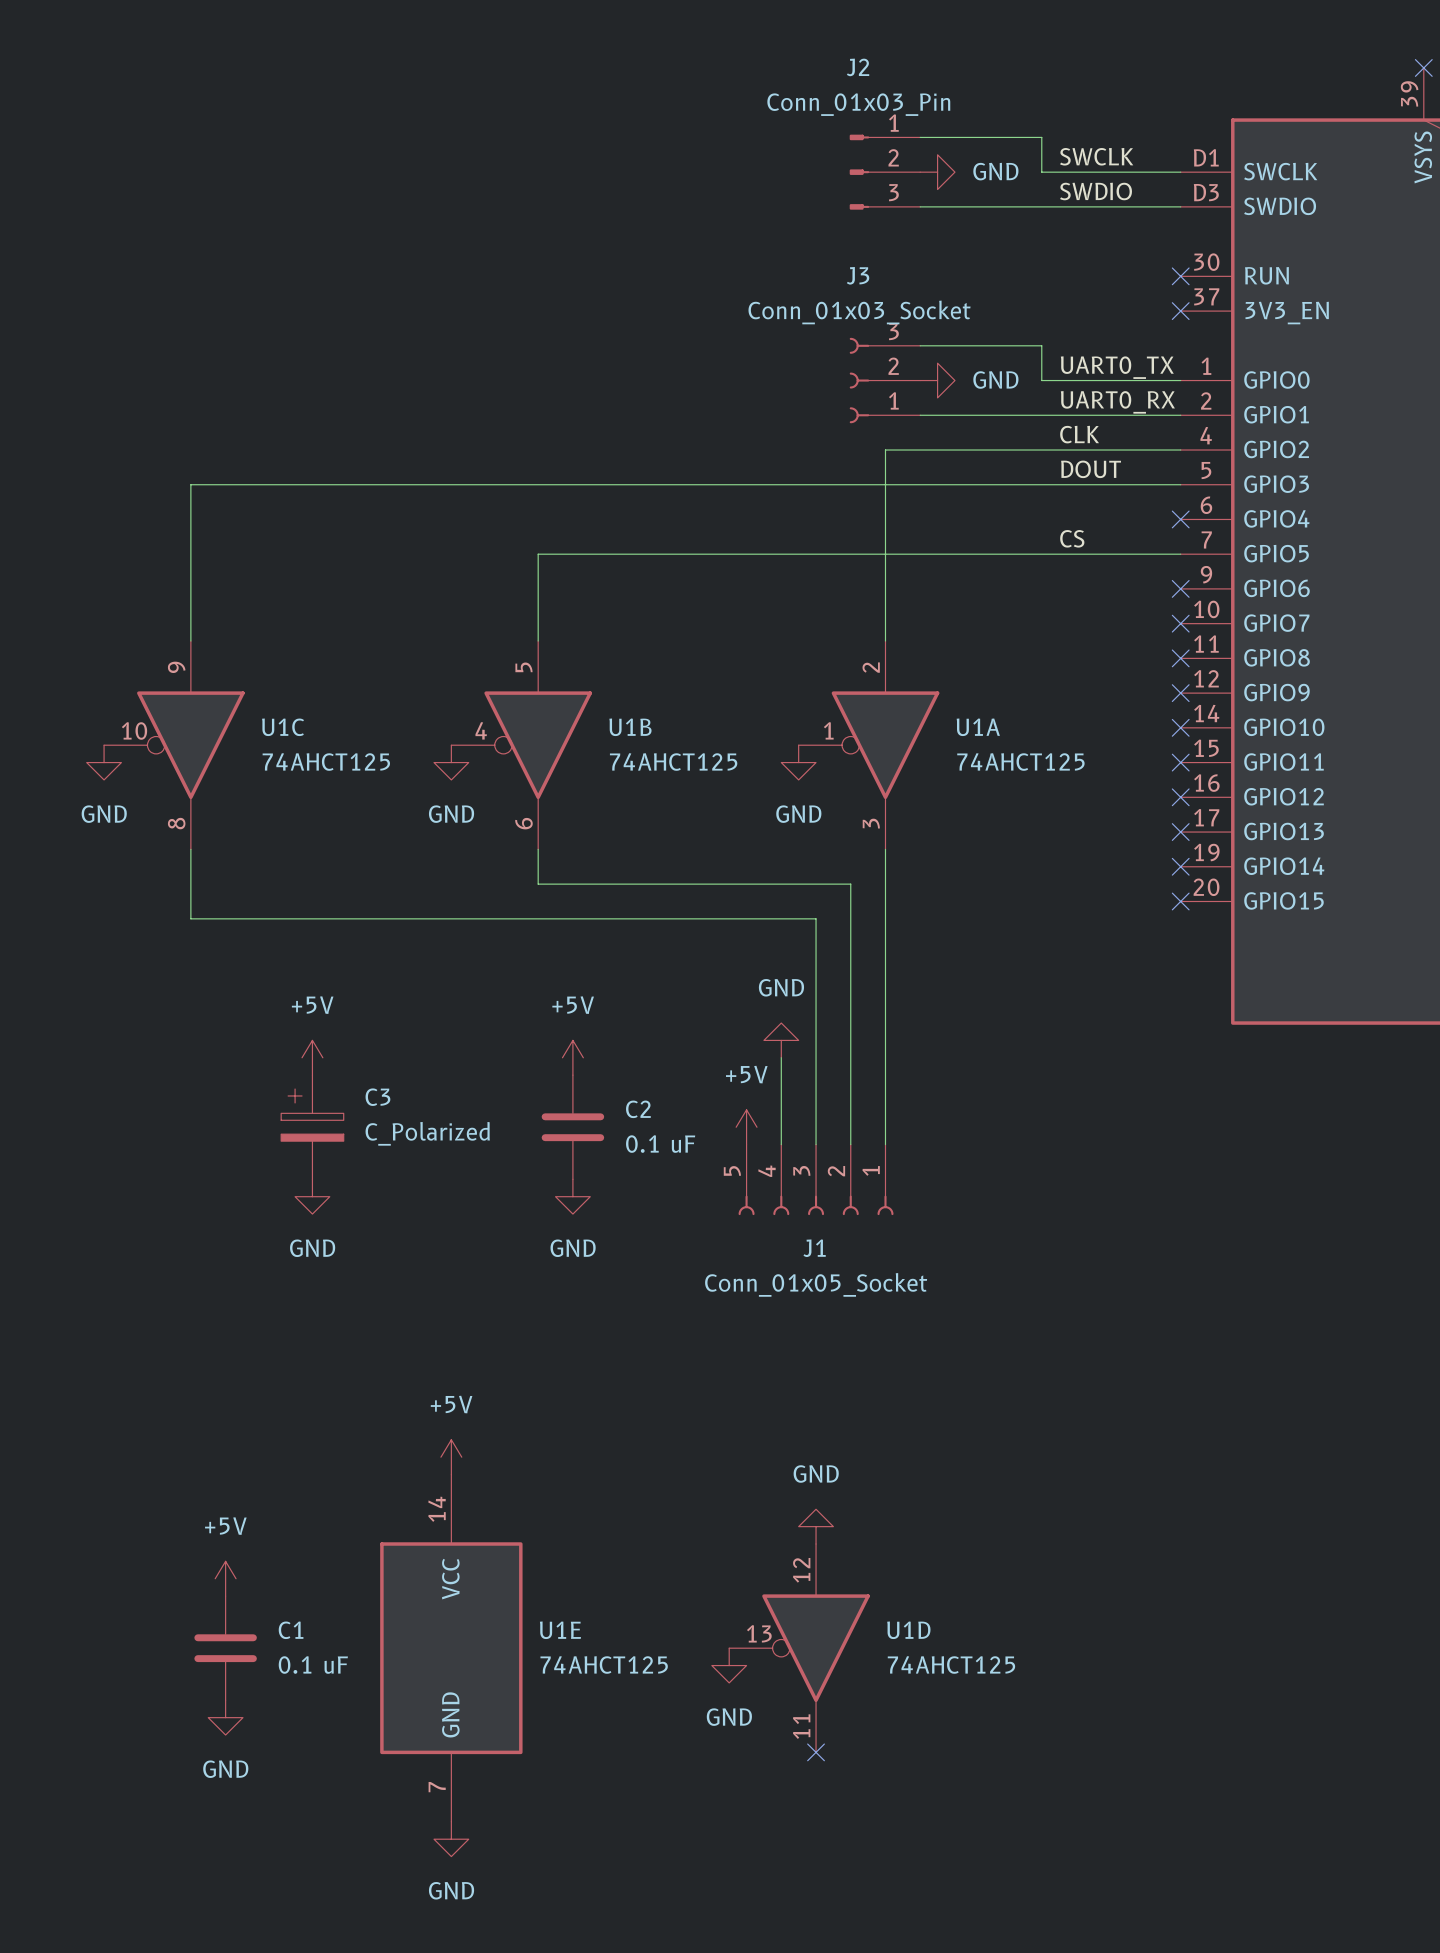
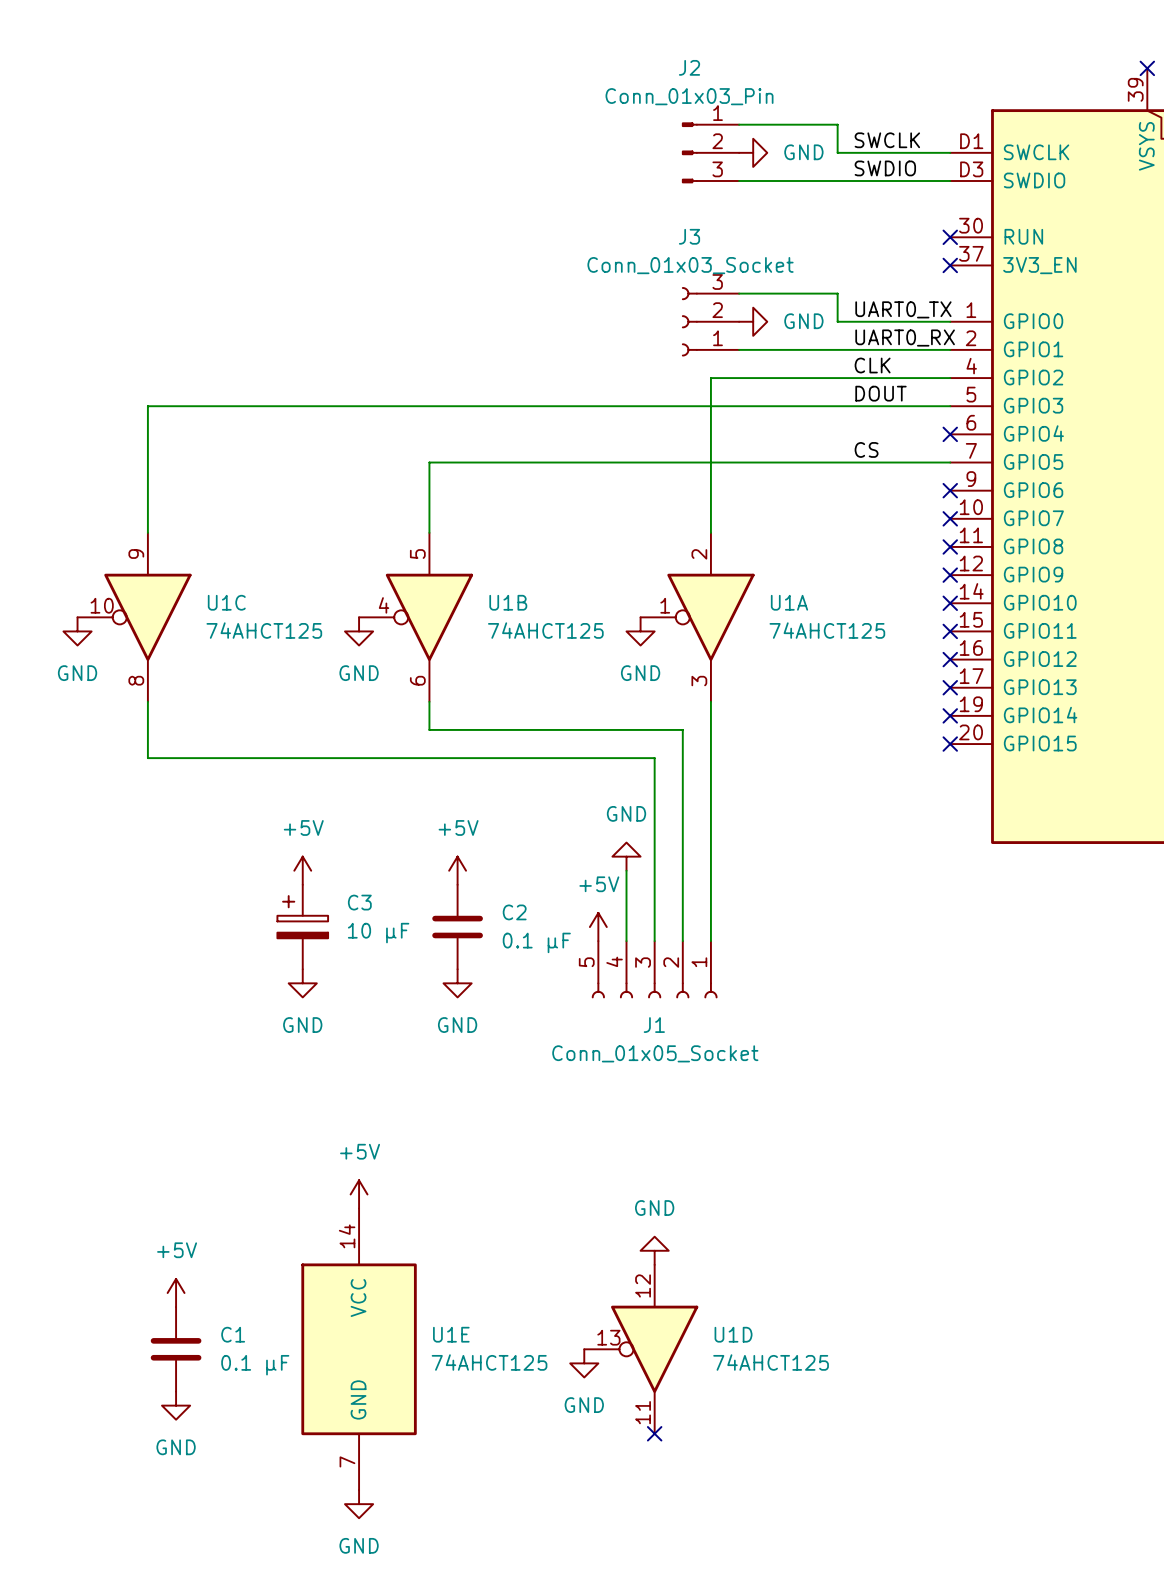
power symbol position: +5V (312, 1057) -> +5V (302, 870)
C3 position: (312, 1127) -> (302, 927)
C3 value: C_Polarized (427, 1133) -> 10 μF (378, 933)
C2 value: 0.1 uF (660, 1144) -> 0.1 μF (536, 942)
power symbol position: GND (312, 1196) -> GND (302, 983)
C1 value: 0.1 uF (313, 1665) -> 0.1 μF (255, 1365)

